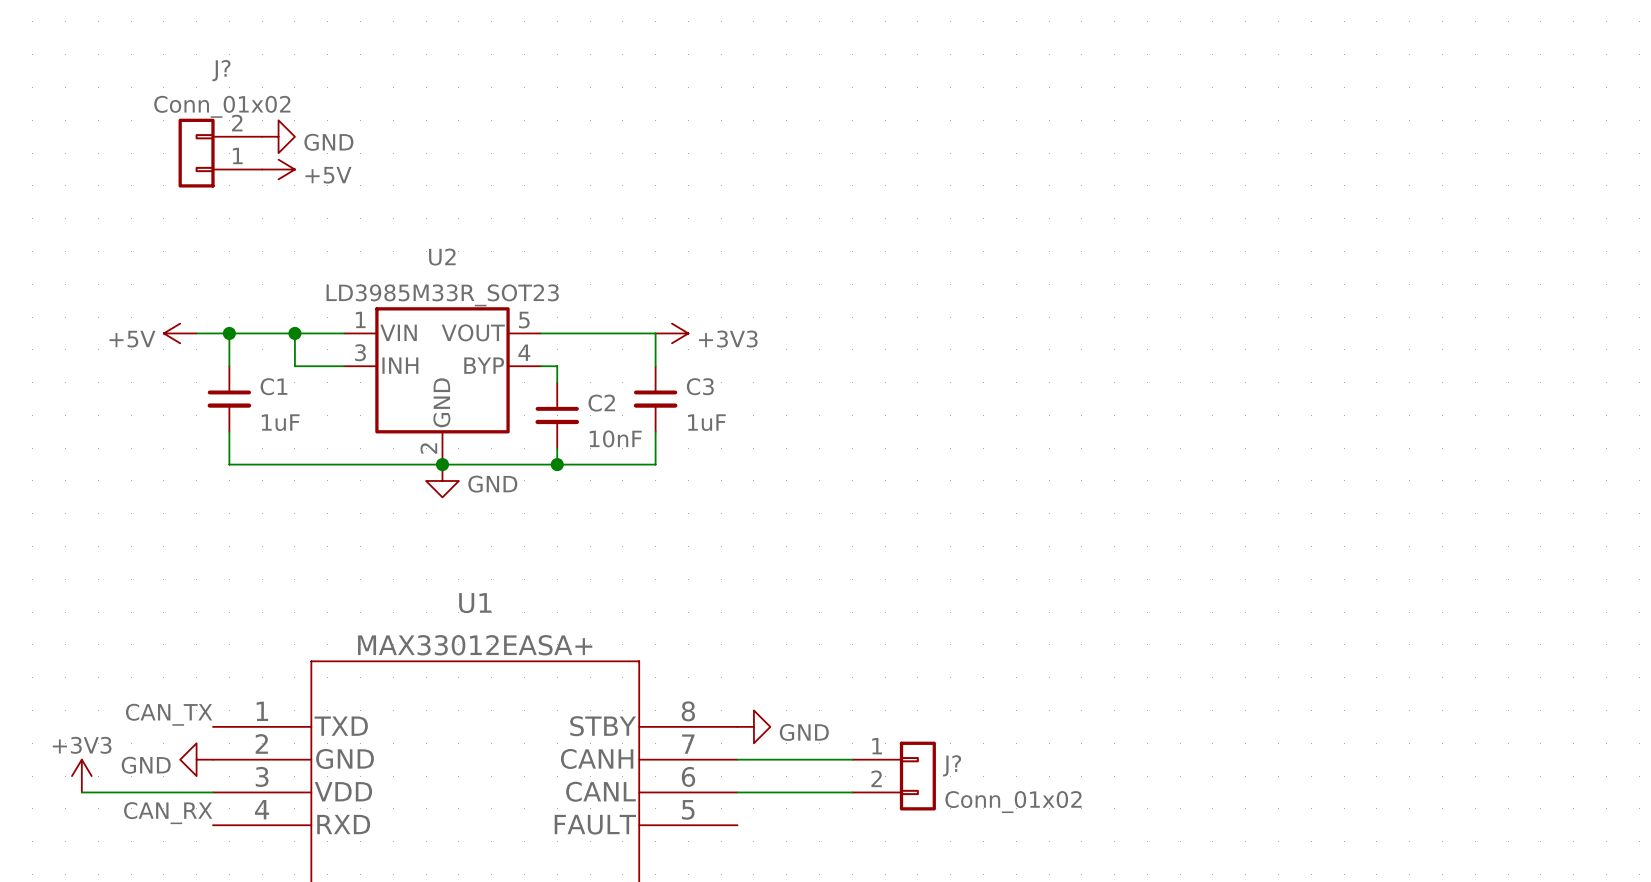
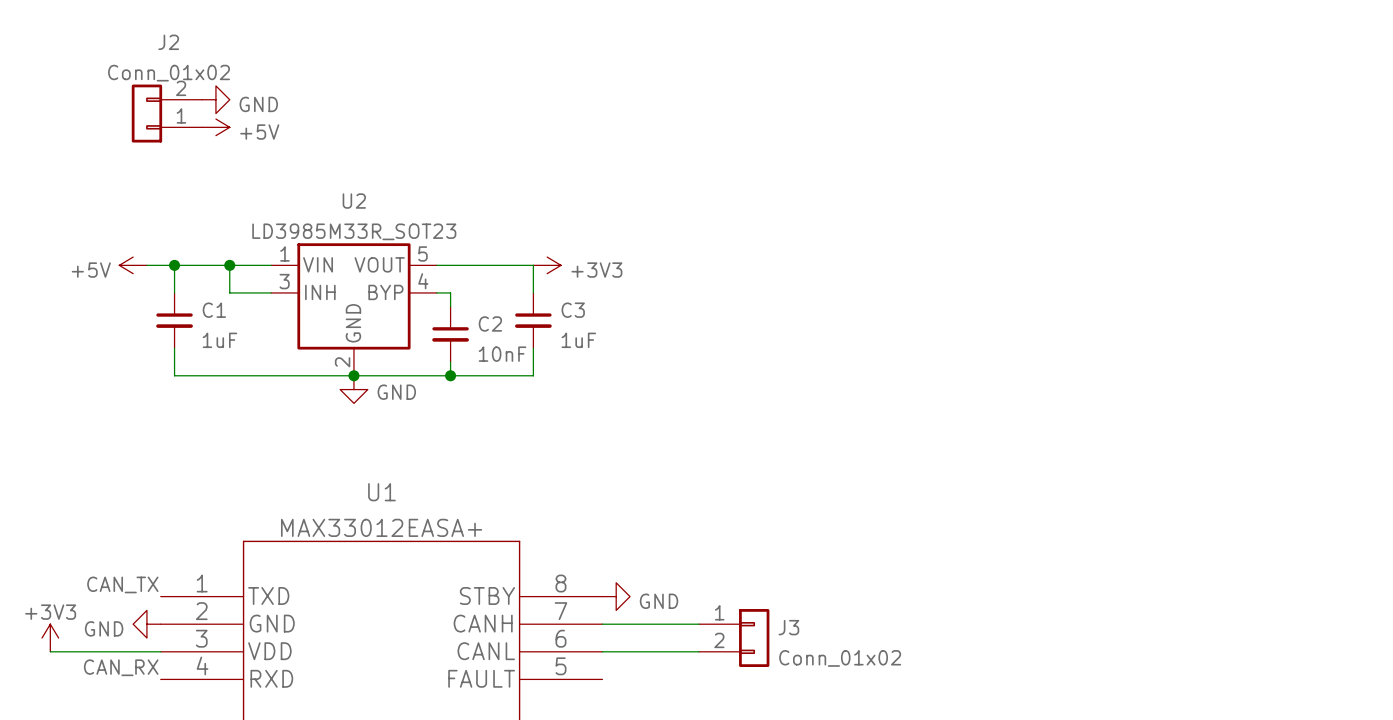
J? name: J? (221, 70) -> J2 (168, 42)
J? name: J? (952, 765) -> J3 (788, 627)

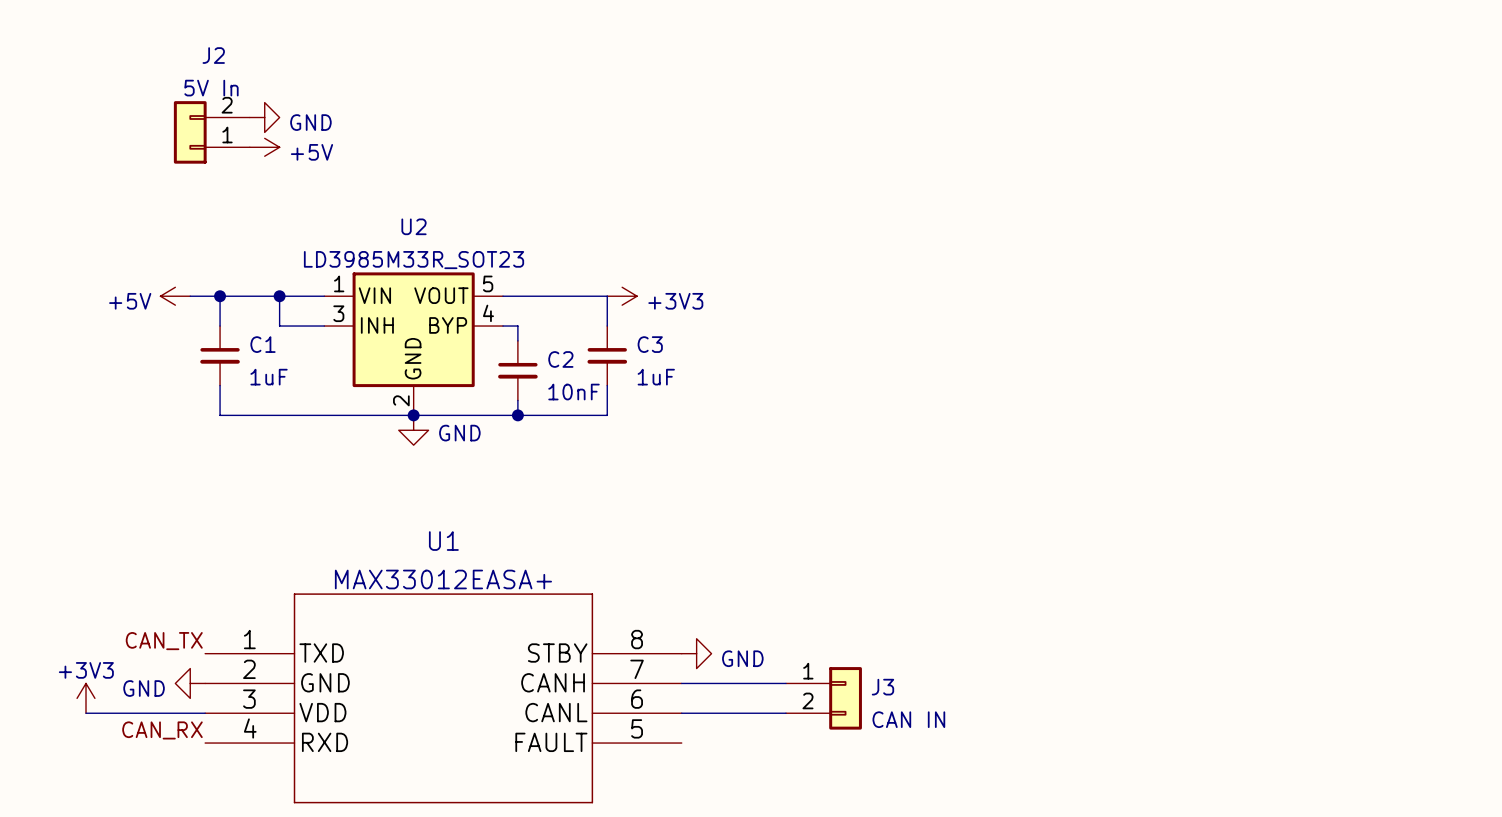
J2 value: Conn_01x02 (169, 73) -> 5V In (211, 88)
J3 value: Conn_01x02 (840, 658) -> CAN IN (908, 719)

